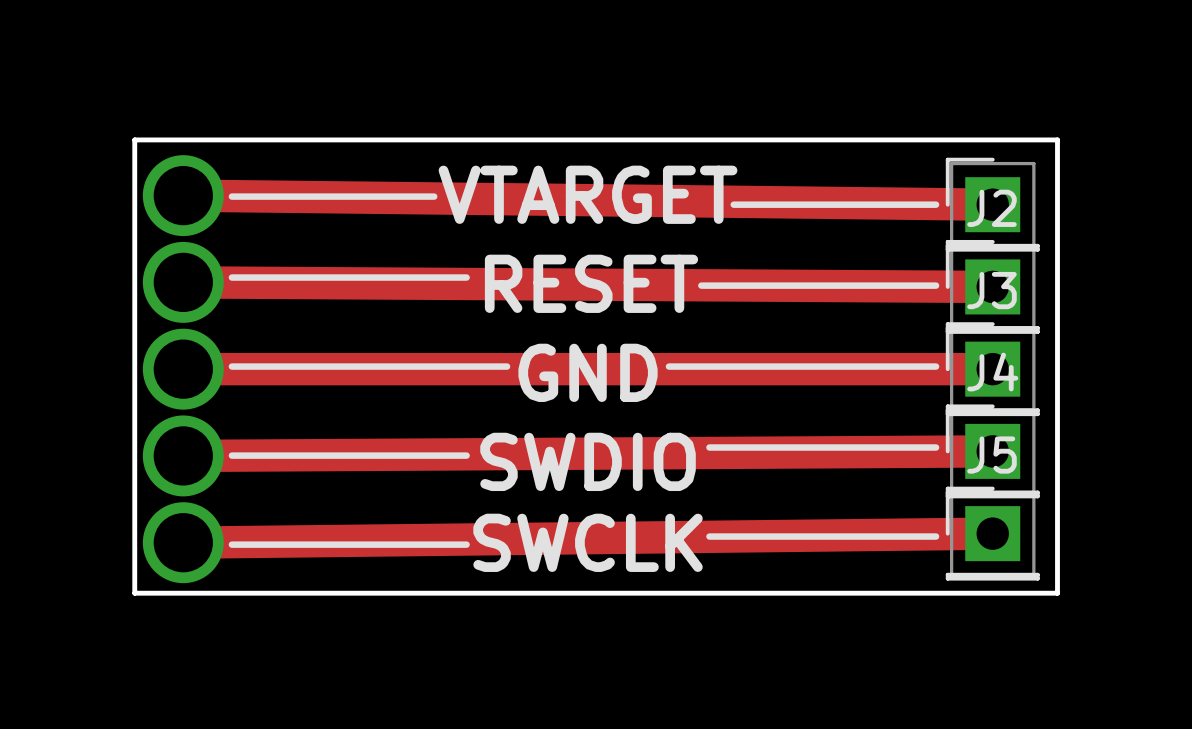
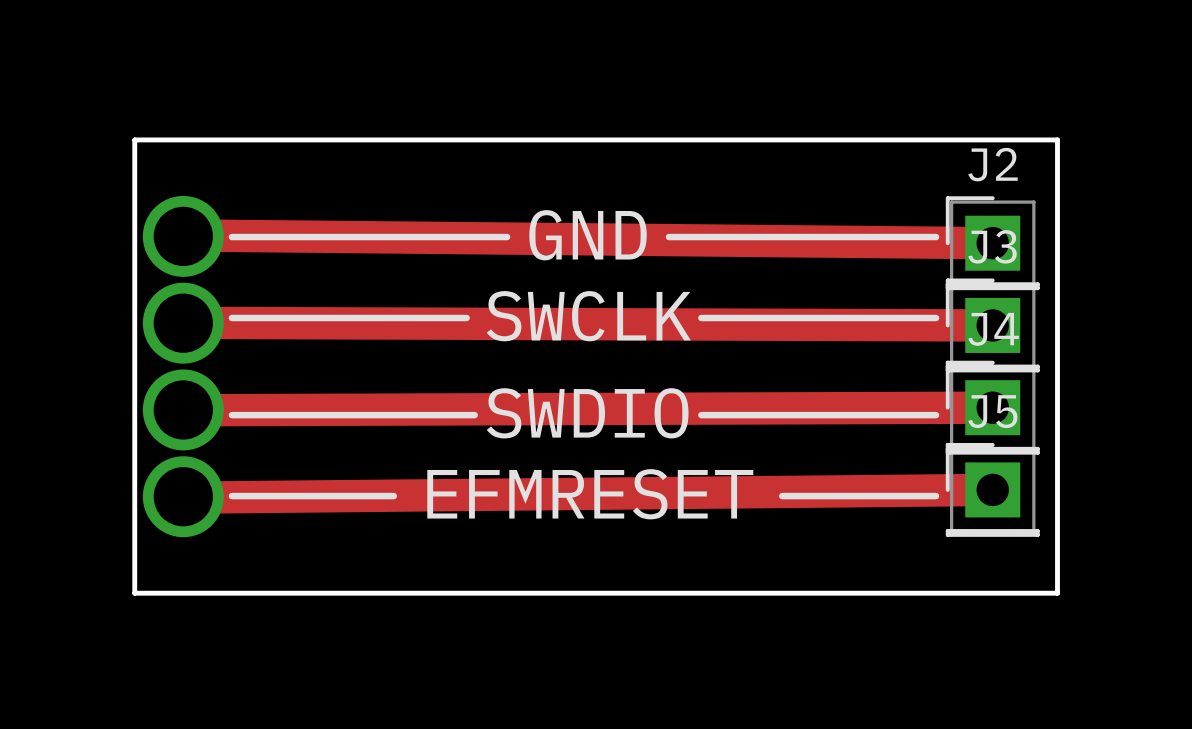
text: VTARGET (588, 194) -> none
top track: (183, 195) (992, 204) -> none
part: (183, 195) -> none
line: (231, 196) (434, 196) -> none
line: (733, 204) (936, 204) -> none
part: (992, 204) -> none
top track: none -> (183, 235) (992, 243)
part: none -> (183, 236)
line: (231, 277) (466, 277) -> (231, 318) (466, 318)
top track: (183, 282) (992, 286) -> none
part: (183, 282) -> none
text: RESET (591, 283) -> none
line: (701, 285) (936, 285) -> (701, 318) (936, 318)
J2 position: (992, 286) -> (992, 243)
top track: none -> (183, 322) (992, 325)
part: none -> (183, 323)
line: (231, 366) (507, 366) -> (231, 237) (507, 237)
line: (668, 366) (936, 366) -> (668, 237) (936, 237)
top track: (183, 369) (992, 369) -> none
part: (183, 369) -> none
J3 position: (992, 369) -> (992, 325)
text position: GND (588, 372) -> GND (588, 235)
top track: none -> (992, 407) (183, 410)
part: none -> (183, 409)
line: none -> (231, 415) (474, 415)
line: (709, 447) (936, 447) -> none
top track: (992, 451) (183, 455) -> none
J4 position: (992, 451) -> (992, 407)
part: (183, 455) -> none
line: (231, 455) (466, 455) -> (701, 415) (936, 415)
text position: SWDIO (588, 461) -> SWDIO (587, 413)
top track: none -> (992, 489) (183, 497)
text: none -> EFMRESET (590, 494)
part: none -> (183, 496)
line: none -> (231, 496) (393, 496)
line: none -> (782, 496) (936, 496)
top track: (992, 533) (183, 542) -> none
J5 position: (992, 533) -> (992, 489)
line: (709, 536) (936, 536) -> none
part: (183, 542) -> none
text position: SWCLK (588, 542) -> SWCLK (588, 316)
line: (231, 544) (466, 544) -> none

